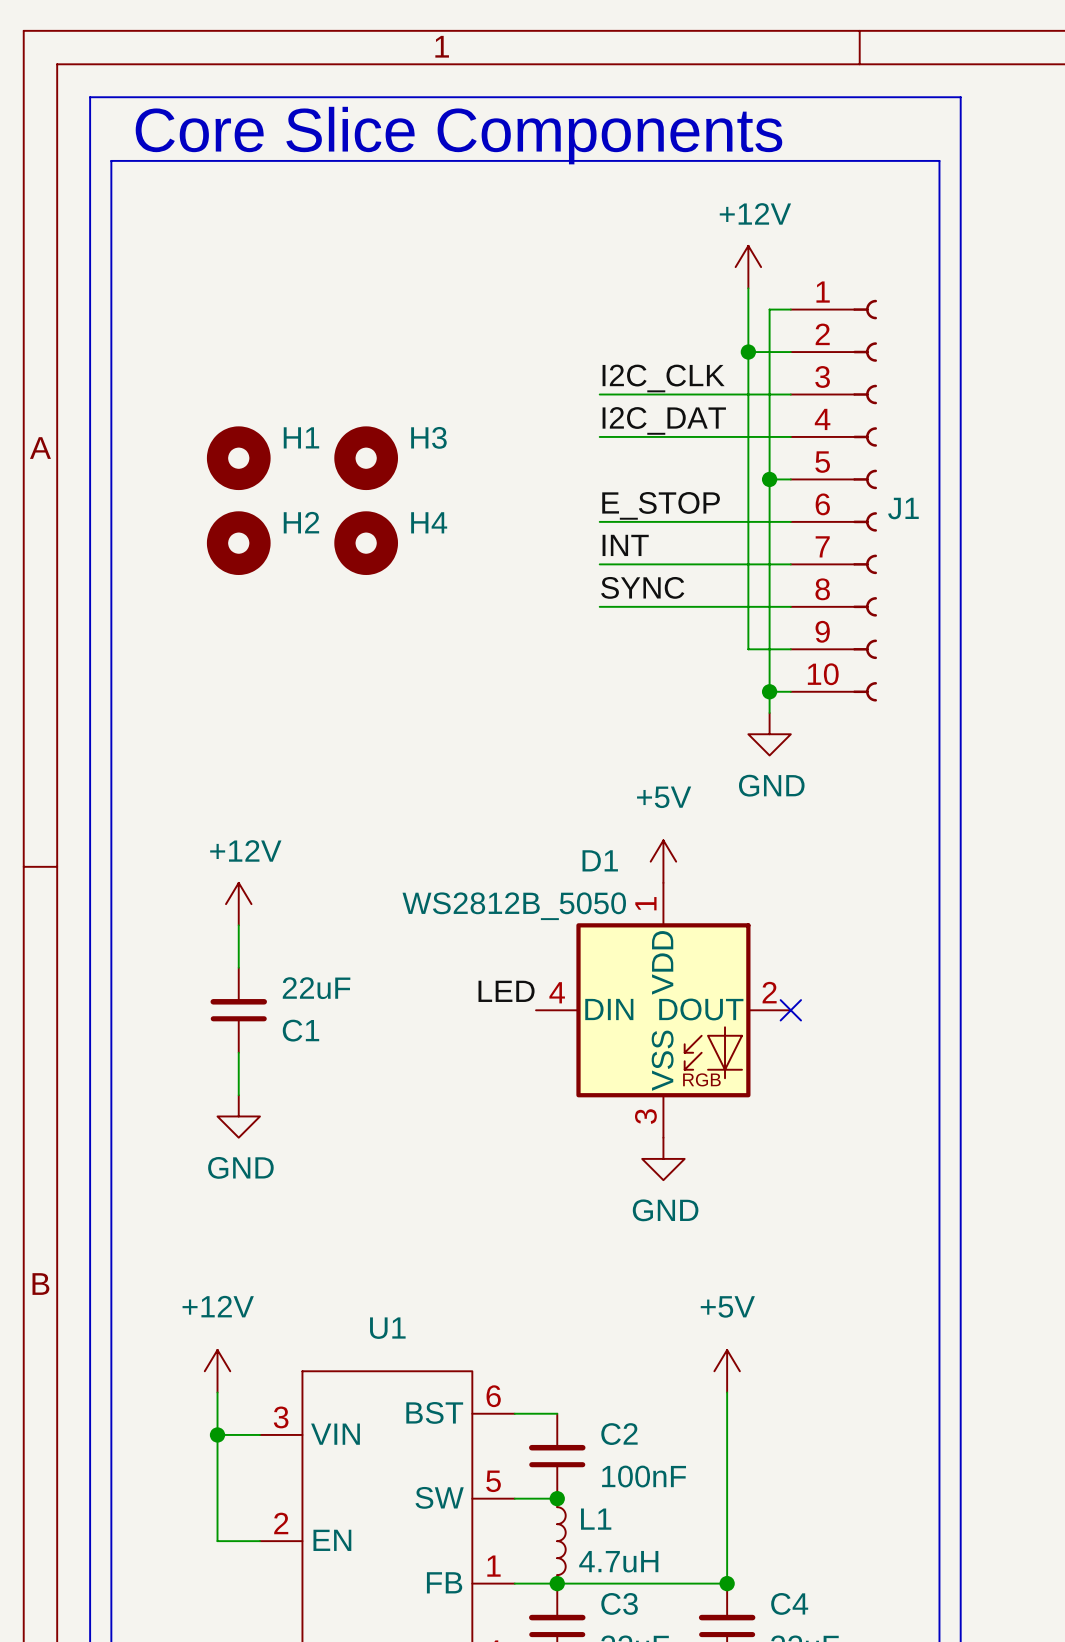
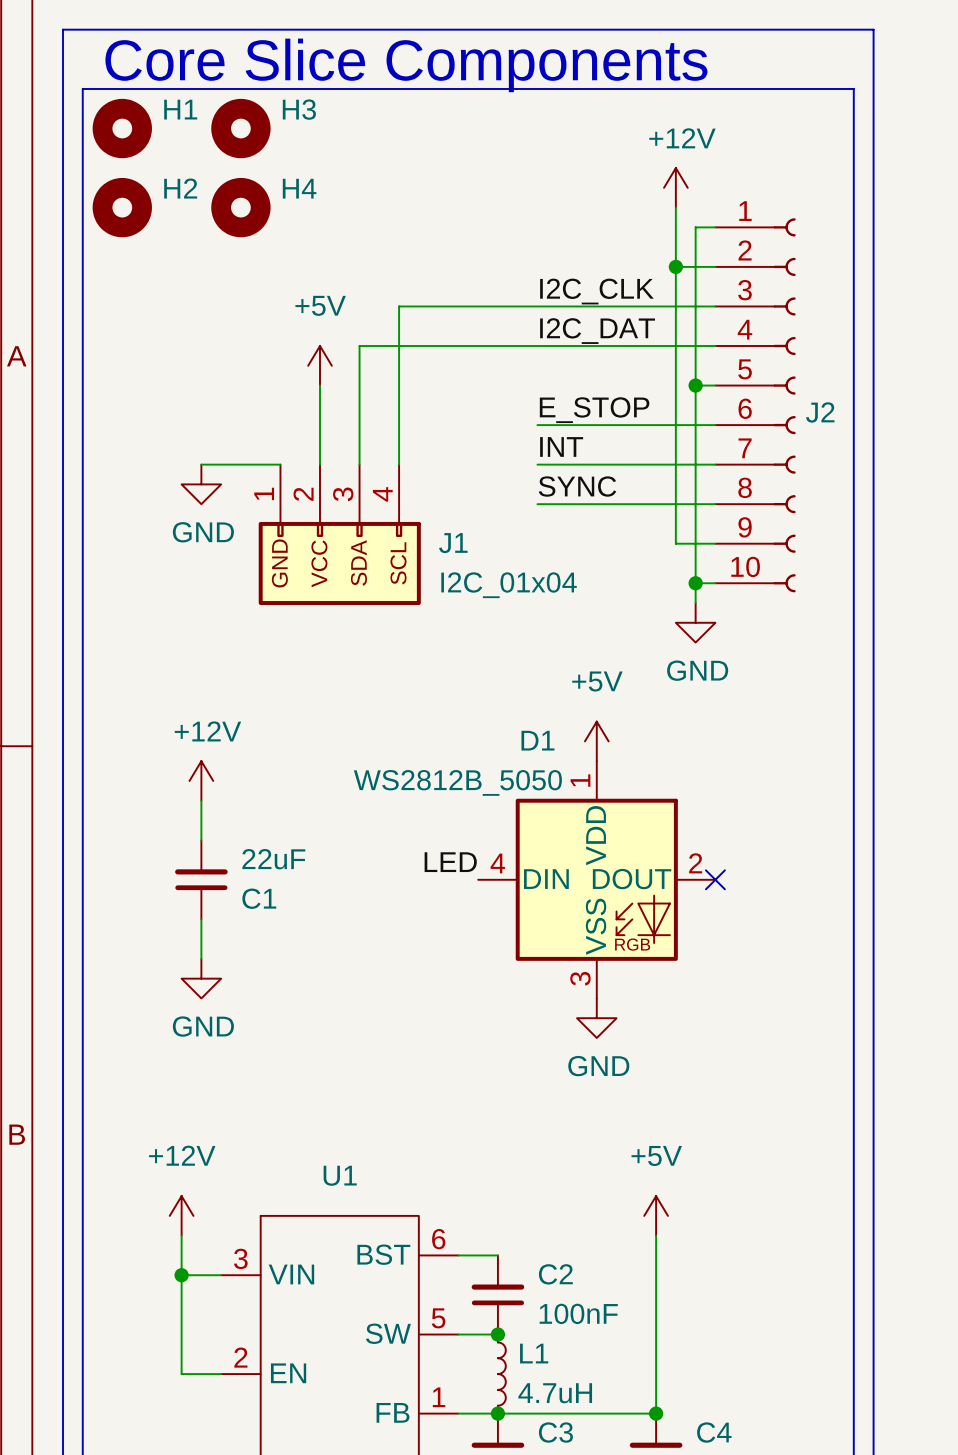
wire: none -> (537, 306) (399, 306) (399, 464)
wire: none -> (537, 346) (359, 346) (359, 464)
H1 position: (238, 458) -> (122, 128)
H3 position: (366, 458) -> (240, 128)
power symbol: none -> +5V (320, 365)
wire: none -> (320, 385) (320, 464)
J1 name: J1 (903, 508) -> J2 (820, 412)
H2 position: (238, 543) -> (122, 207)
H4 position: (366, 543) -> (240, 207)
wire: none -> (201, 464) (280, 464)
power symbol: none -> GND (201, 484)
J1: none -> I2C_01x04 (339, 534)

